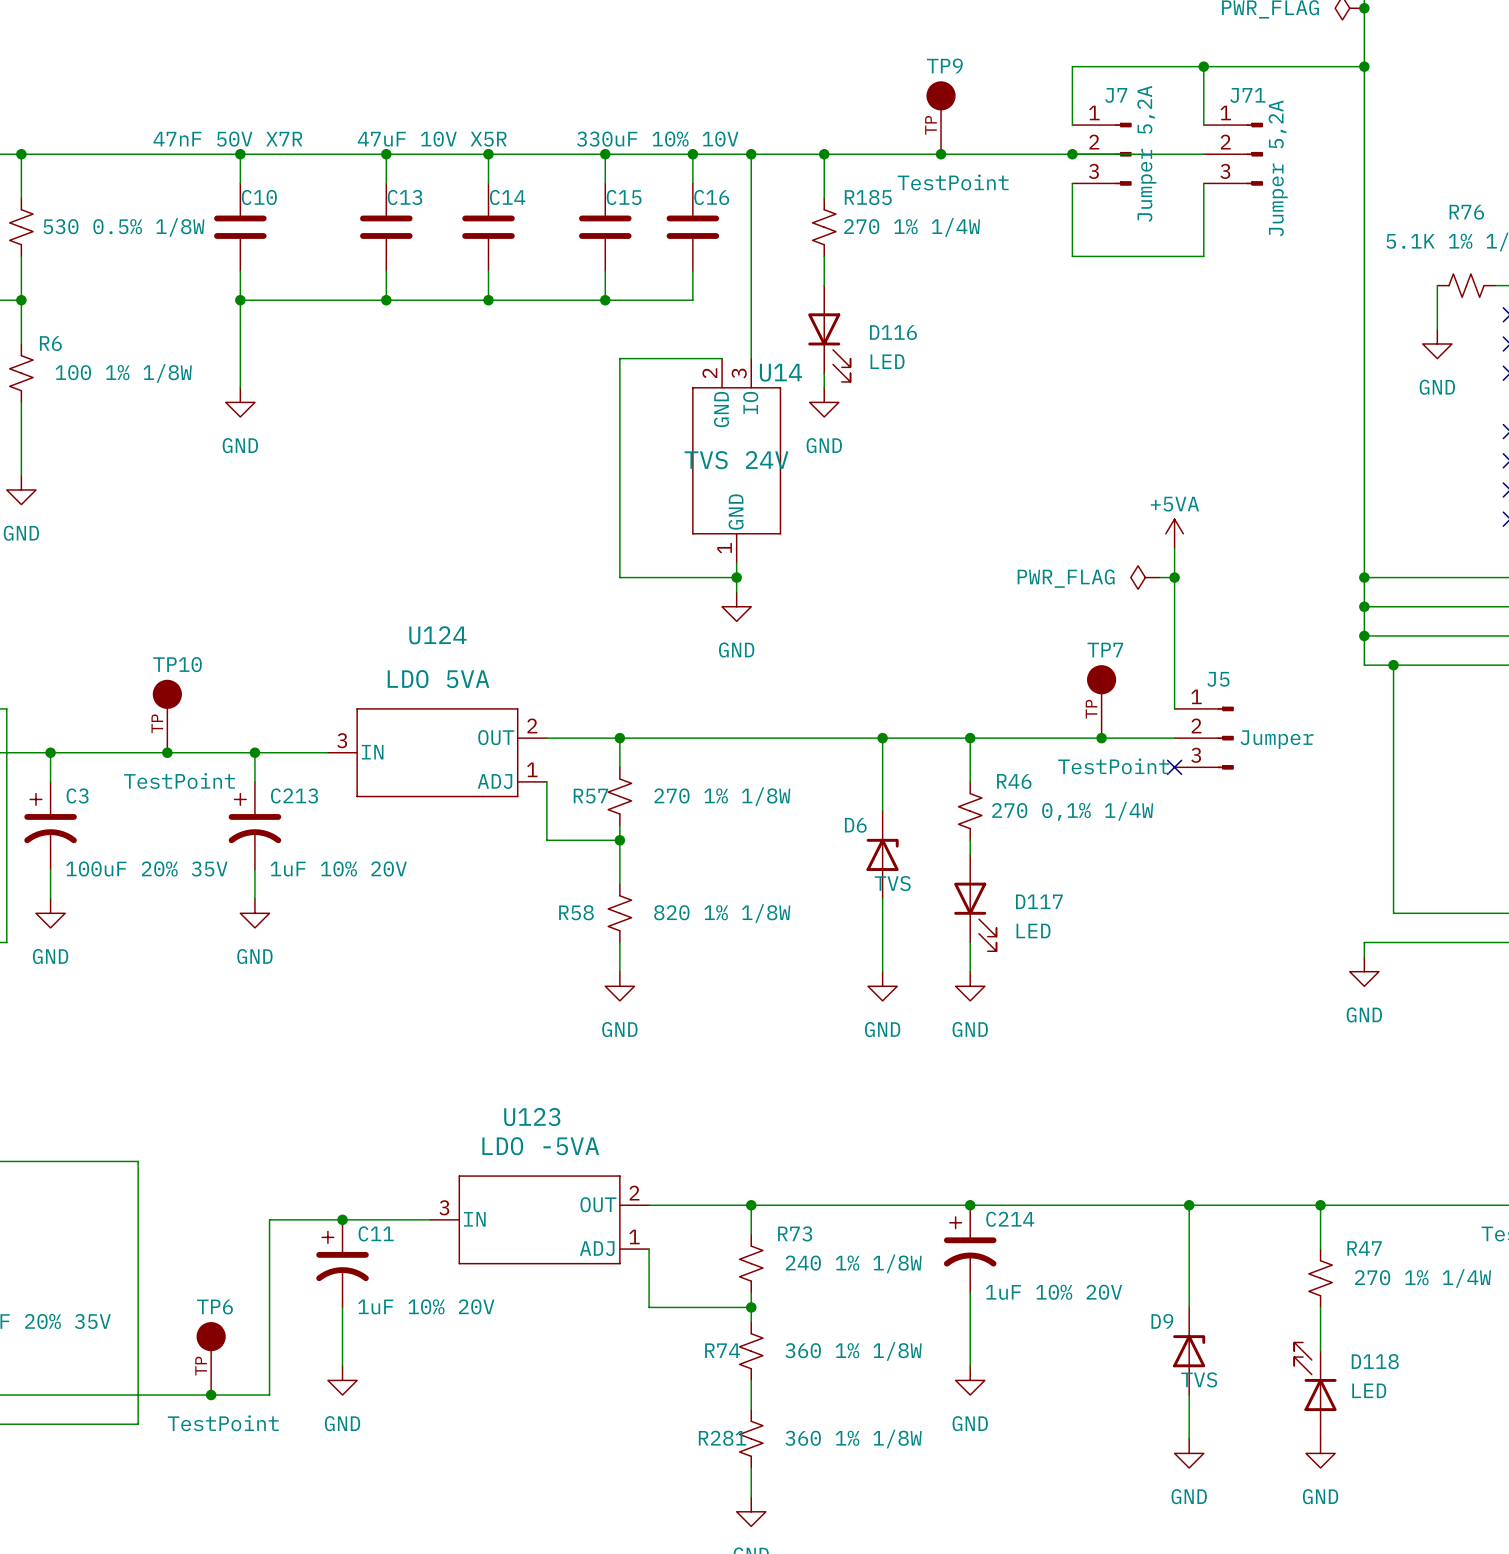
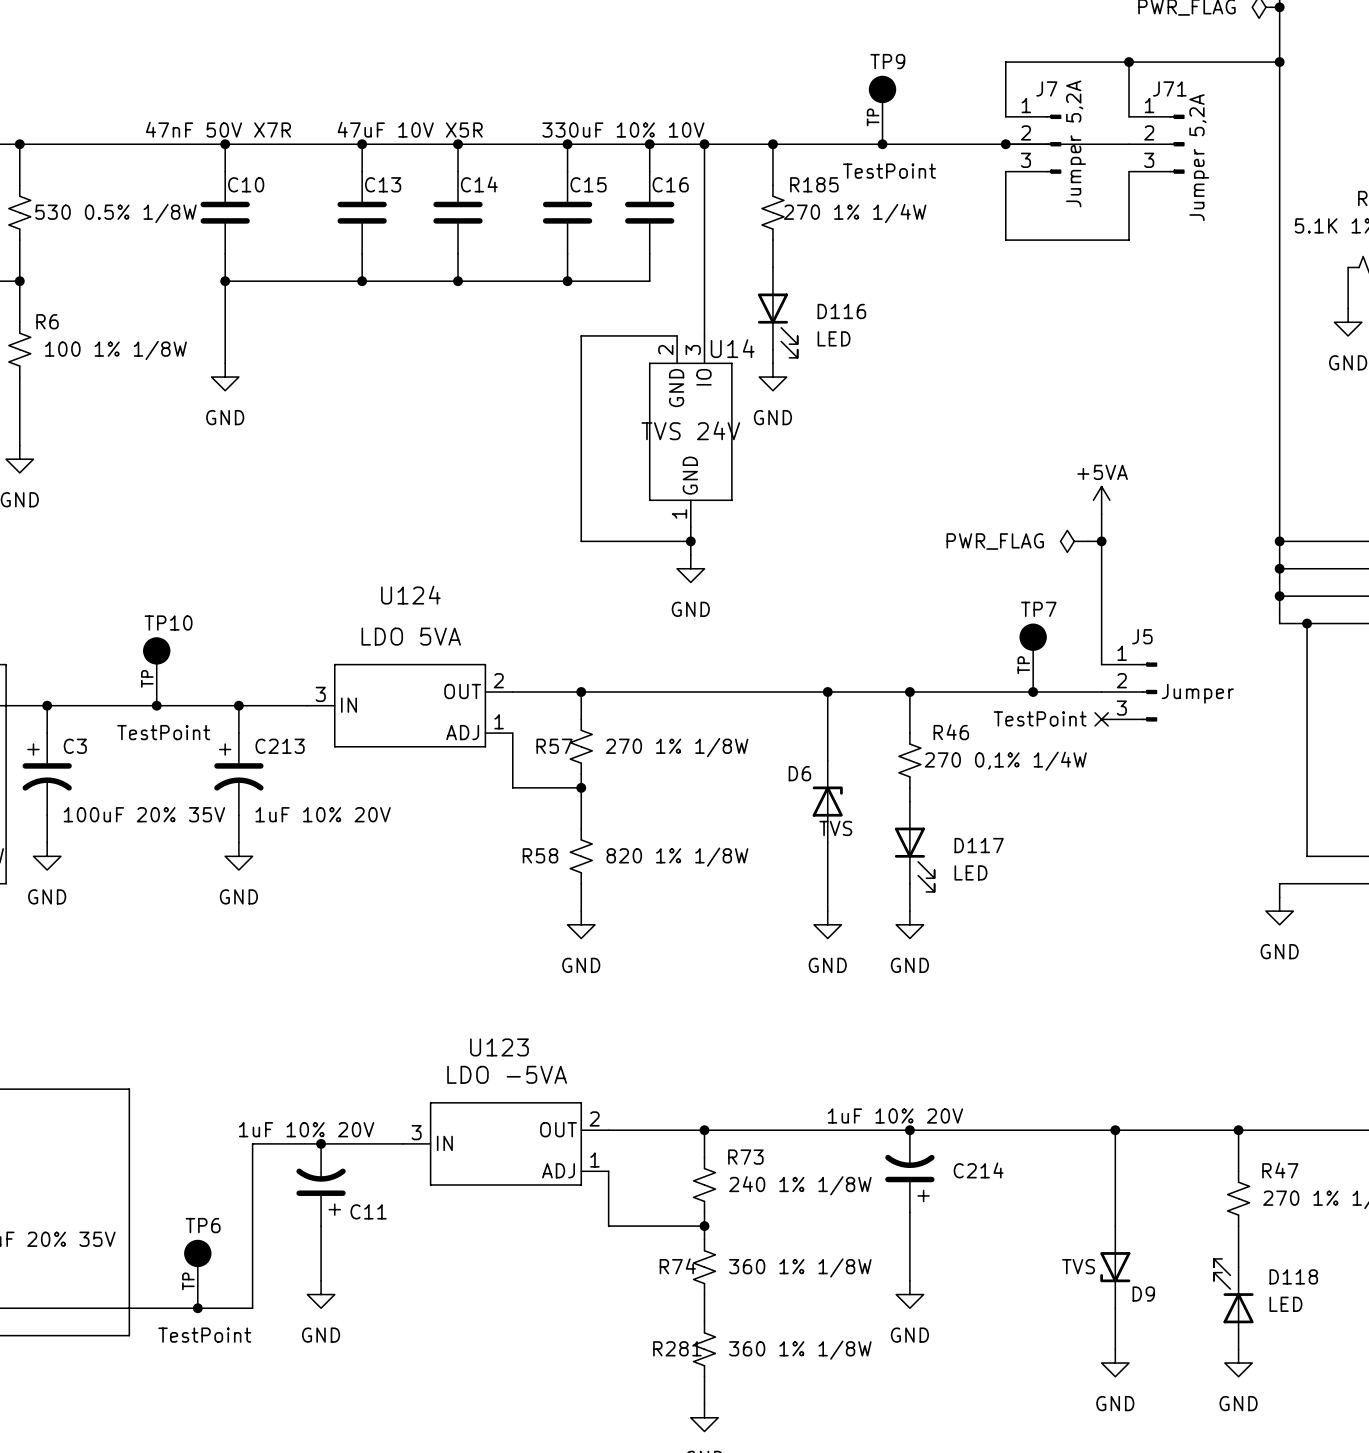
C214 name position: C214 (1010, 1219) -> C214 (978, 1170)
C11 name position: C11 (376, 1233) -> C11 (368, 1211)
C214 rotation: 0° (970, 1241) -> 180° (909, 1178)
C11 rotation: 0° (342, 1256) -> 180° (321, 1191)
C214 value position: 1uF 10% 20V (1054, 1292) -> 1uF 10% 20V (895, 1116)
C11 value position: 1uF 10% 20V (426, 1306) -> 1uF 10% 20V (306, 1129)
D9 rotation: 0° (1189, 1351) -> 180° (1115, 1267)
D9 value position: TVS (1199, 1379) -> TVS (1078, 1266)

